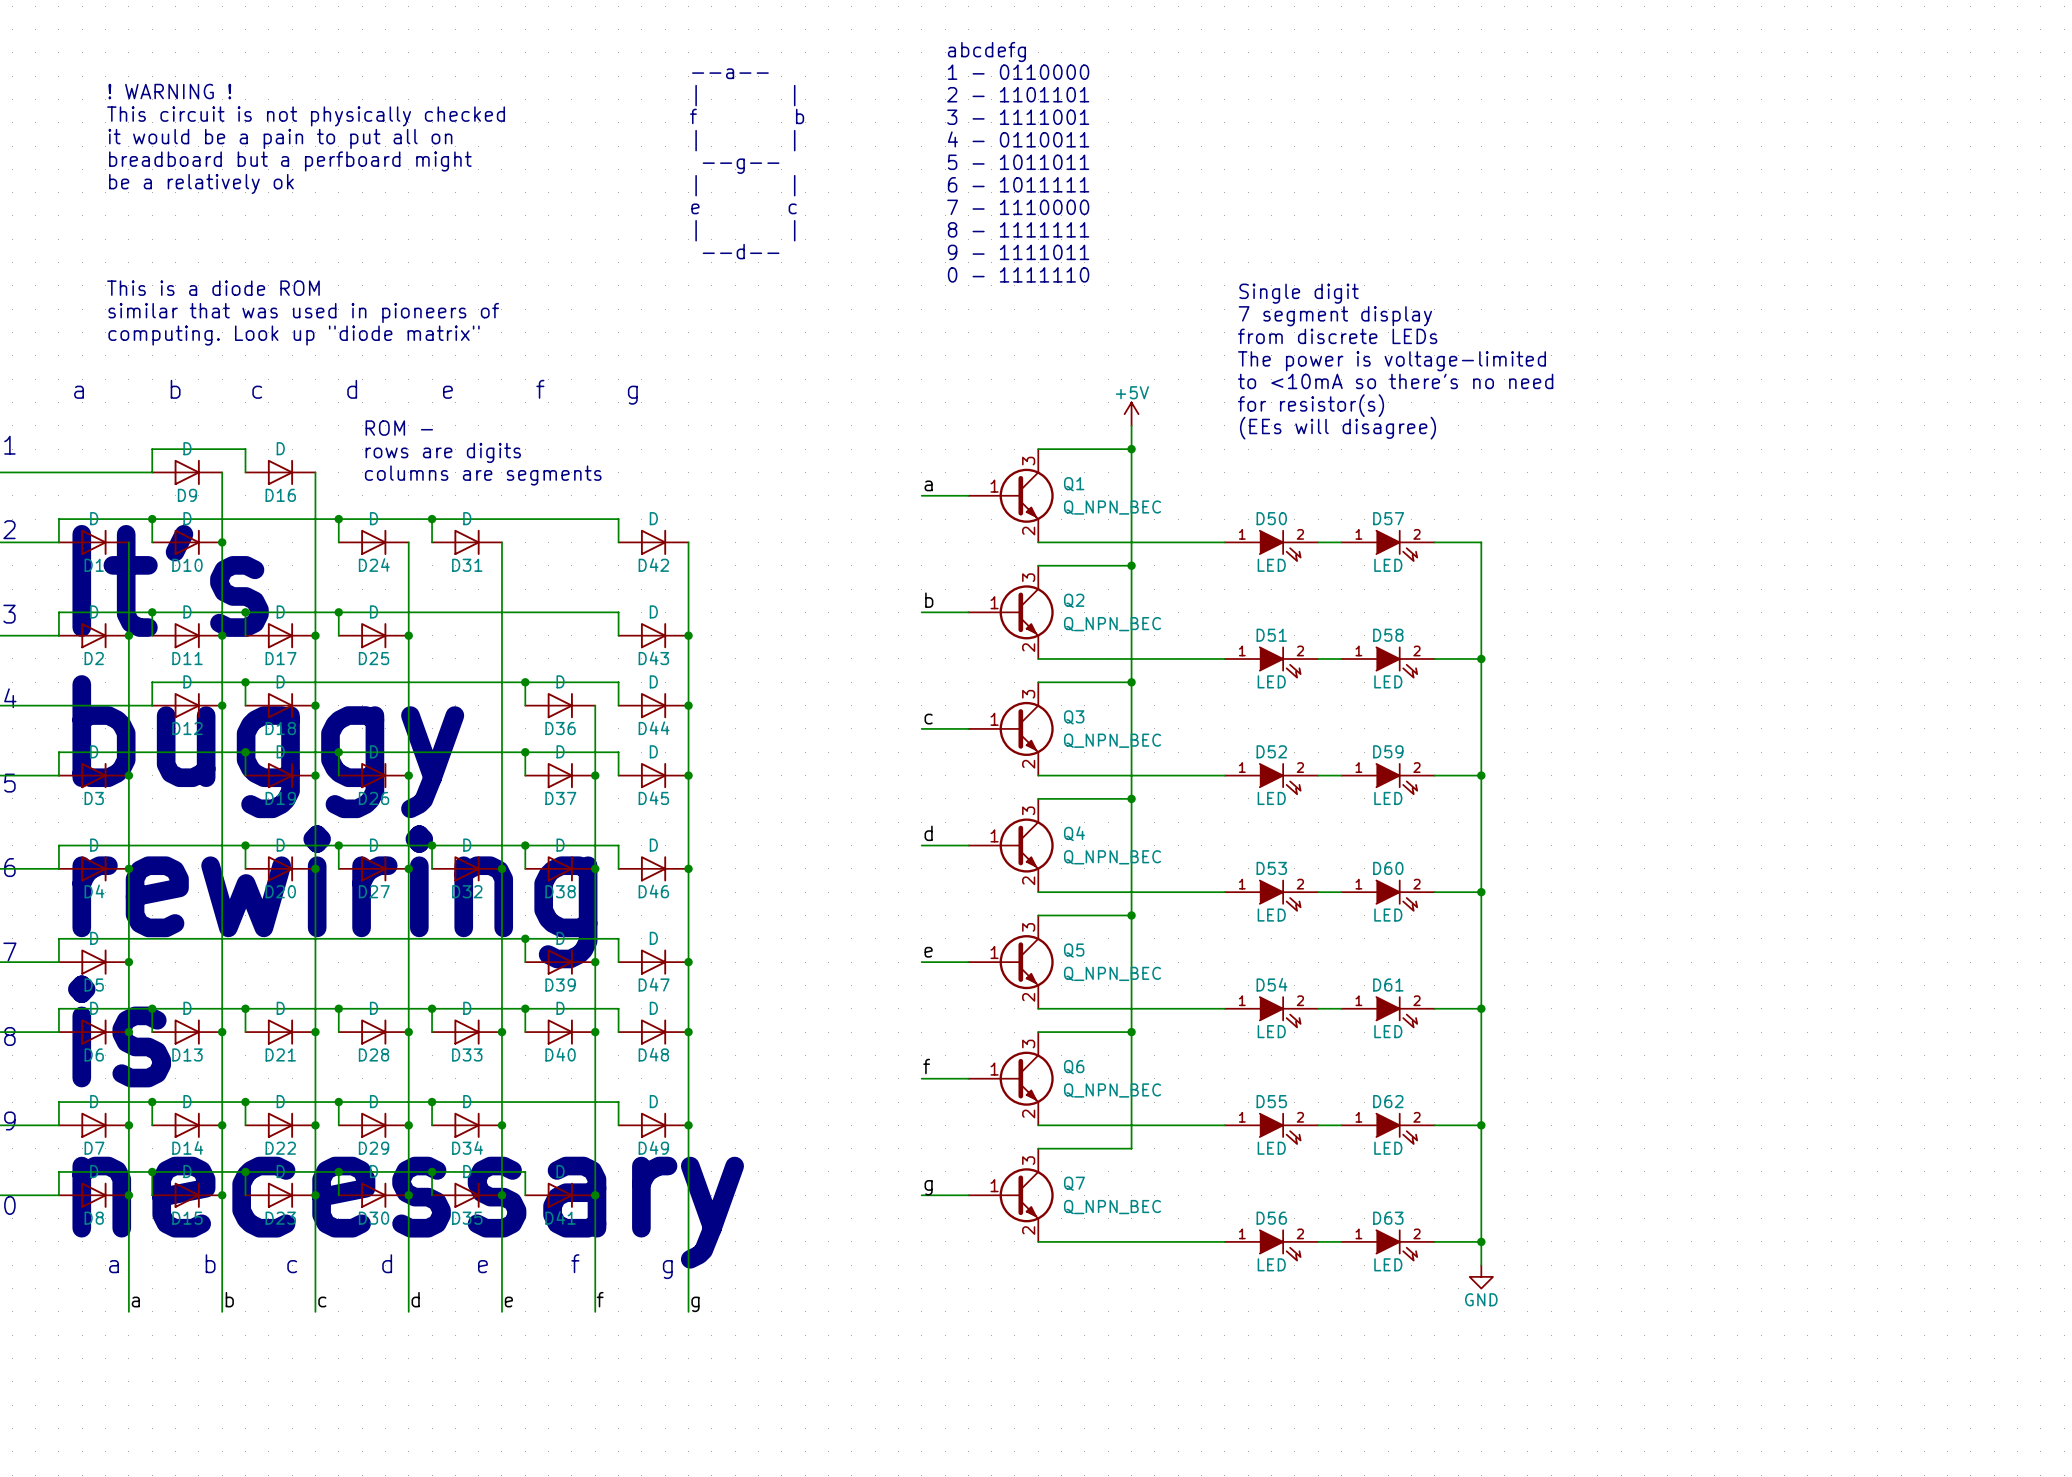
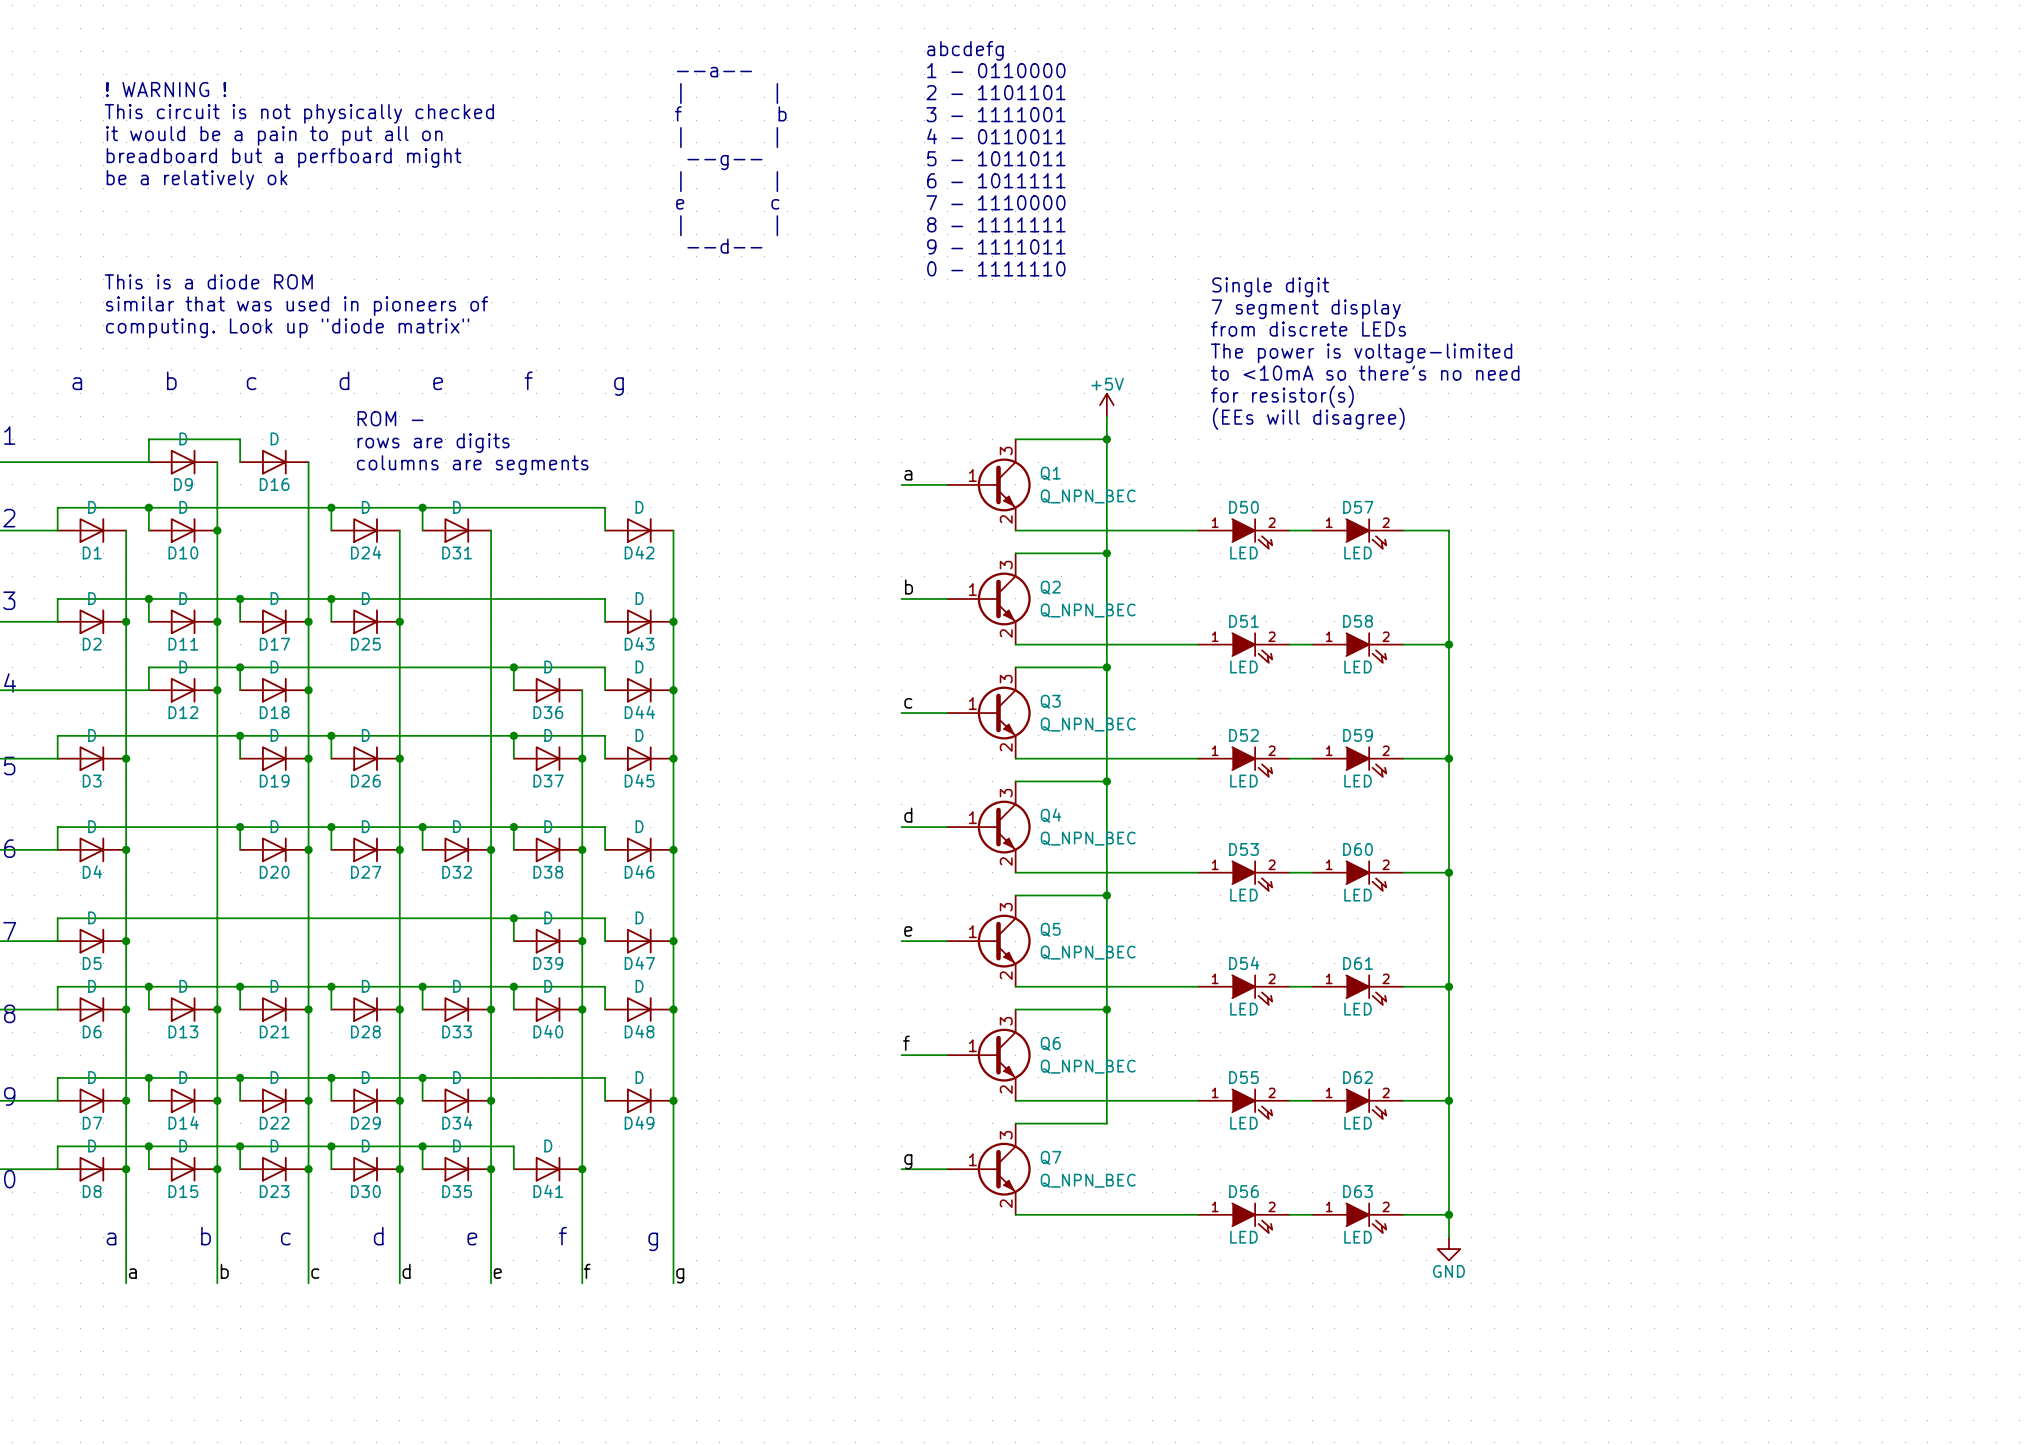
text: It's (170, 580) -> none
text: buggy (268, 746) -> none
text: rewiring (334, 896) -> none
text: is (119, 1031) -> none
text: necessary (408, 1212) -> none

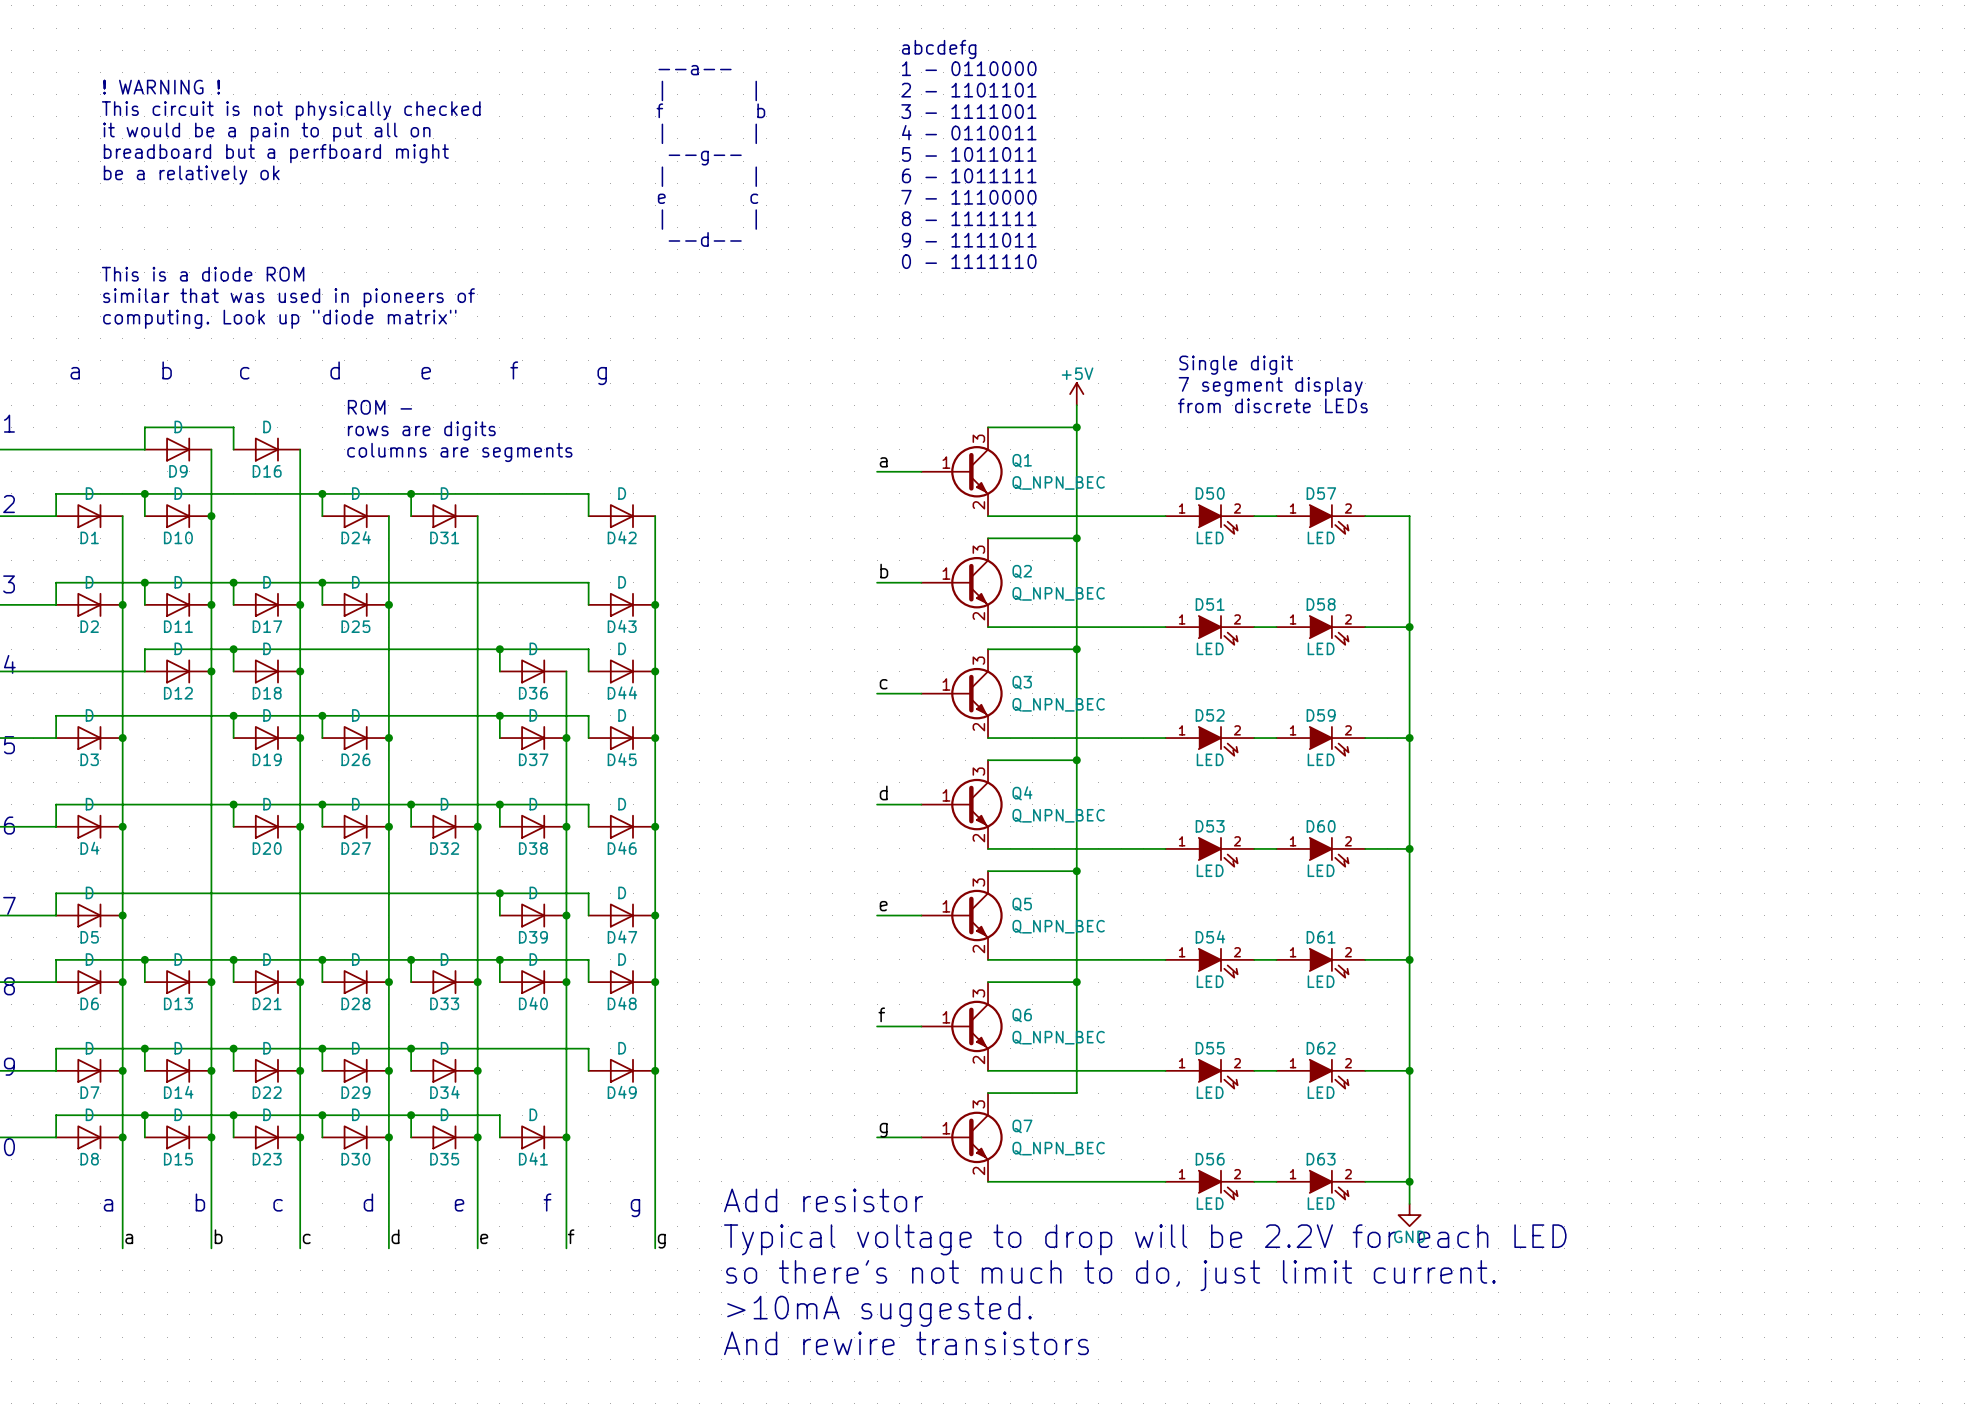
text: Single digit (1270, 287) -> none
text: 7 segment display (1306, 309) -> none
text: from discrete LEDs (1308, 329) -> none
text: The power is voltage-limited (1361, 353) -> none
text: to <10mA so there's no need (1365, 373) -> Single digit (1236, 365)
text: for resistor(s) (1282, 396) -> 7 segment display (1270, 386)
text: (EEs will disagree) (1308, 418) -> from discrete LEDs (1272, 405)
text: none -> Add resistor (823, 1200)
text: none -> Typical voltage to drop will be 2.2V for each LED (1145, 1239)
text: none -> so there's not much to do, just limit current. (1110, 1275)
text: none -> >10mA suggested. (879, 1311)
text: none -> And rewire transistors (906, 1343)

